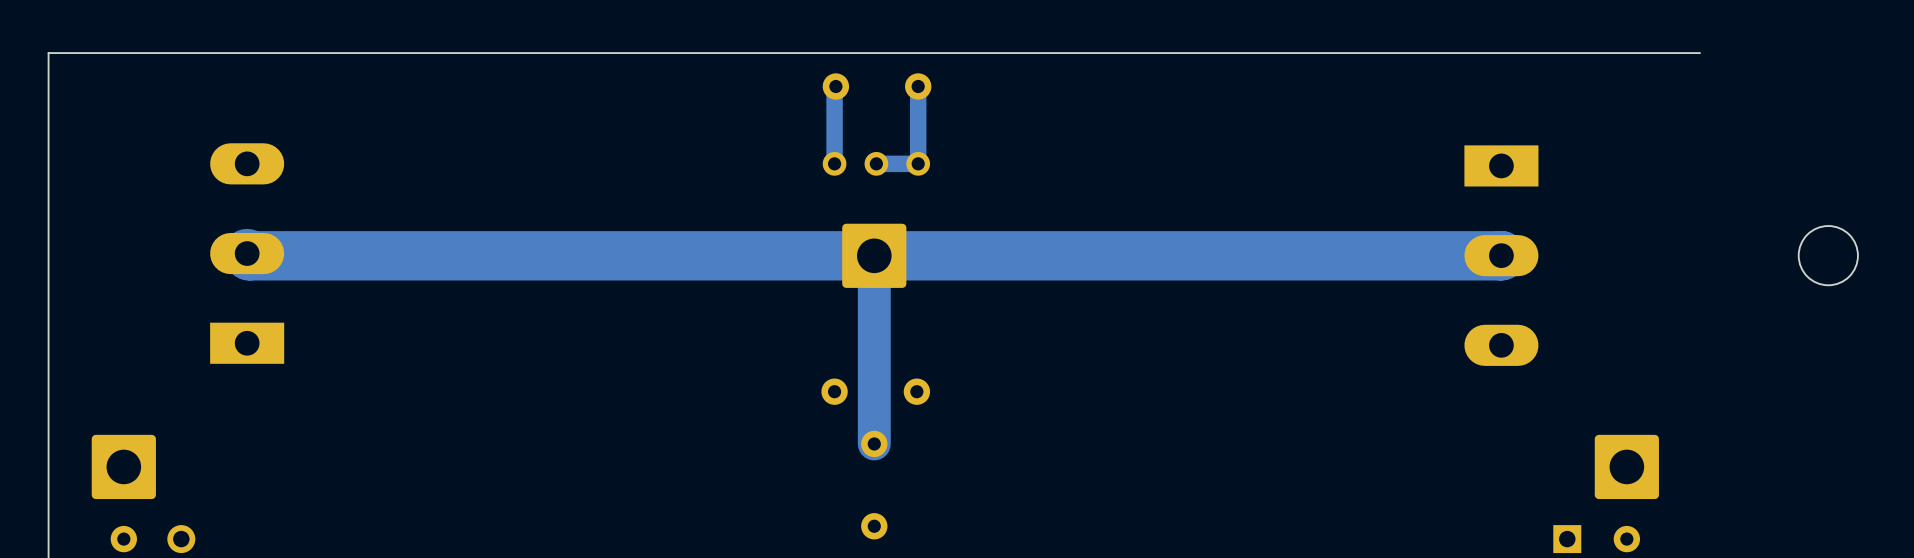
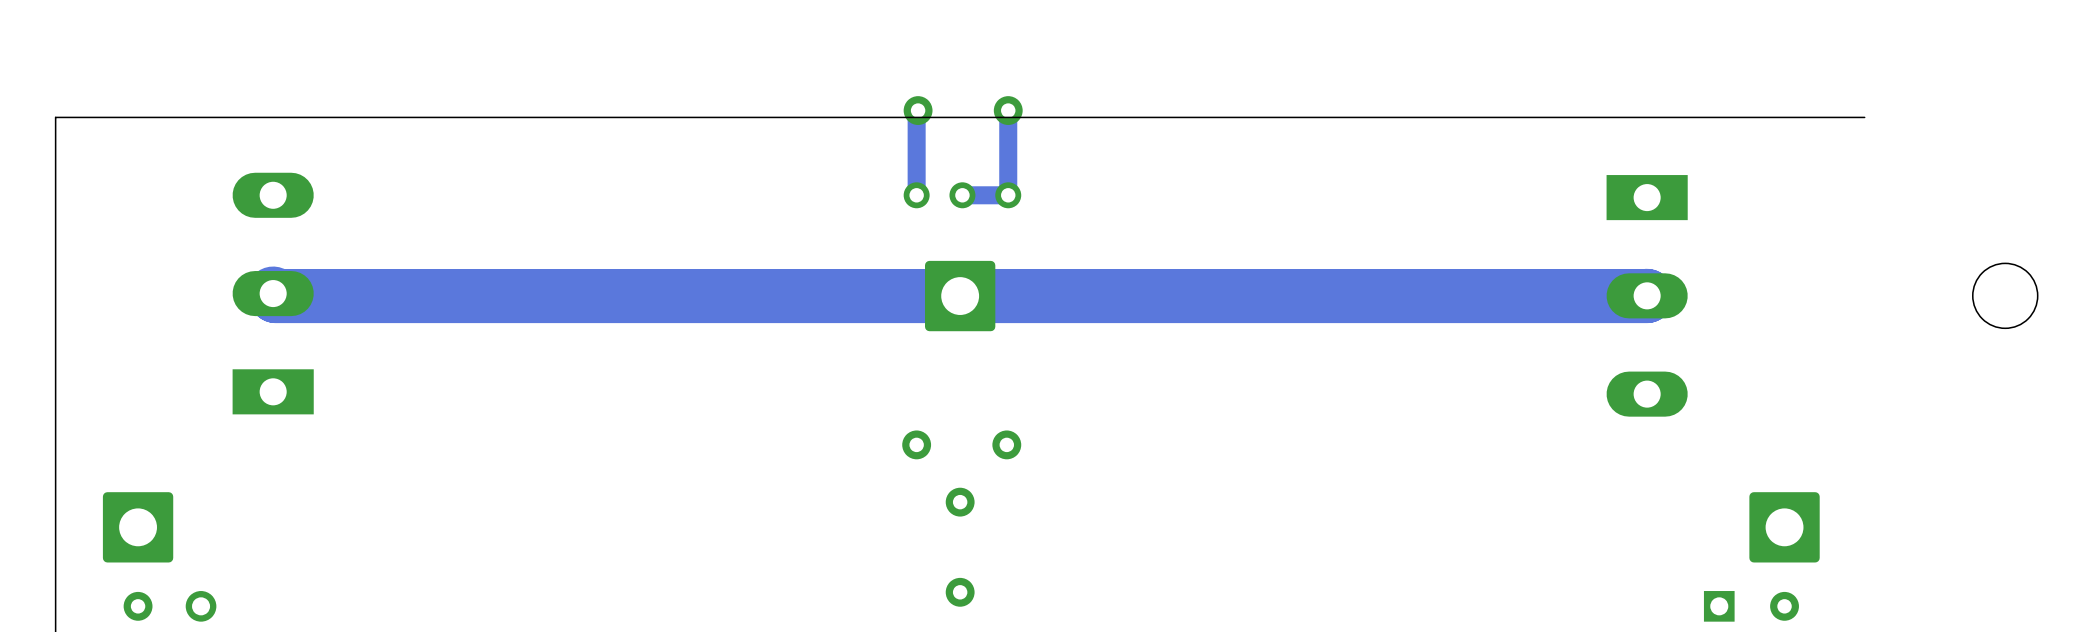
board edge: (1700, 53) (48, 53) (48, 92) -> (1864, 117) (55, 117)
track: (874, 255) (874, 443) -> none

